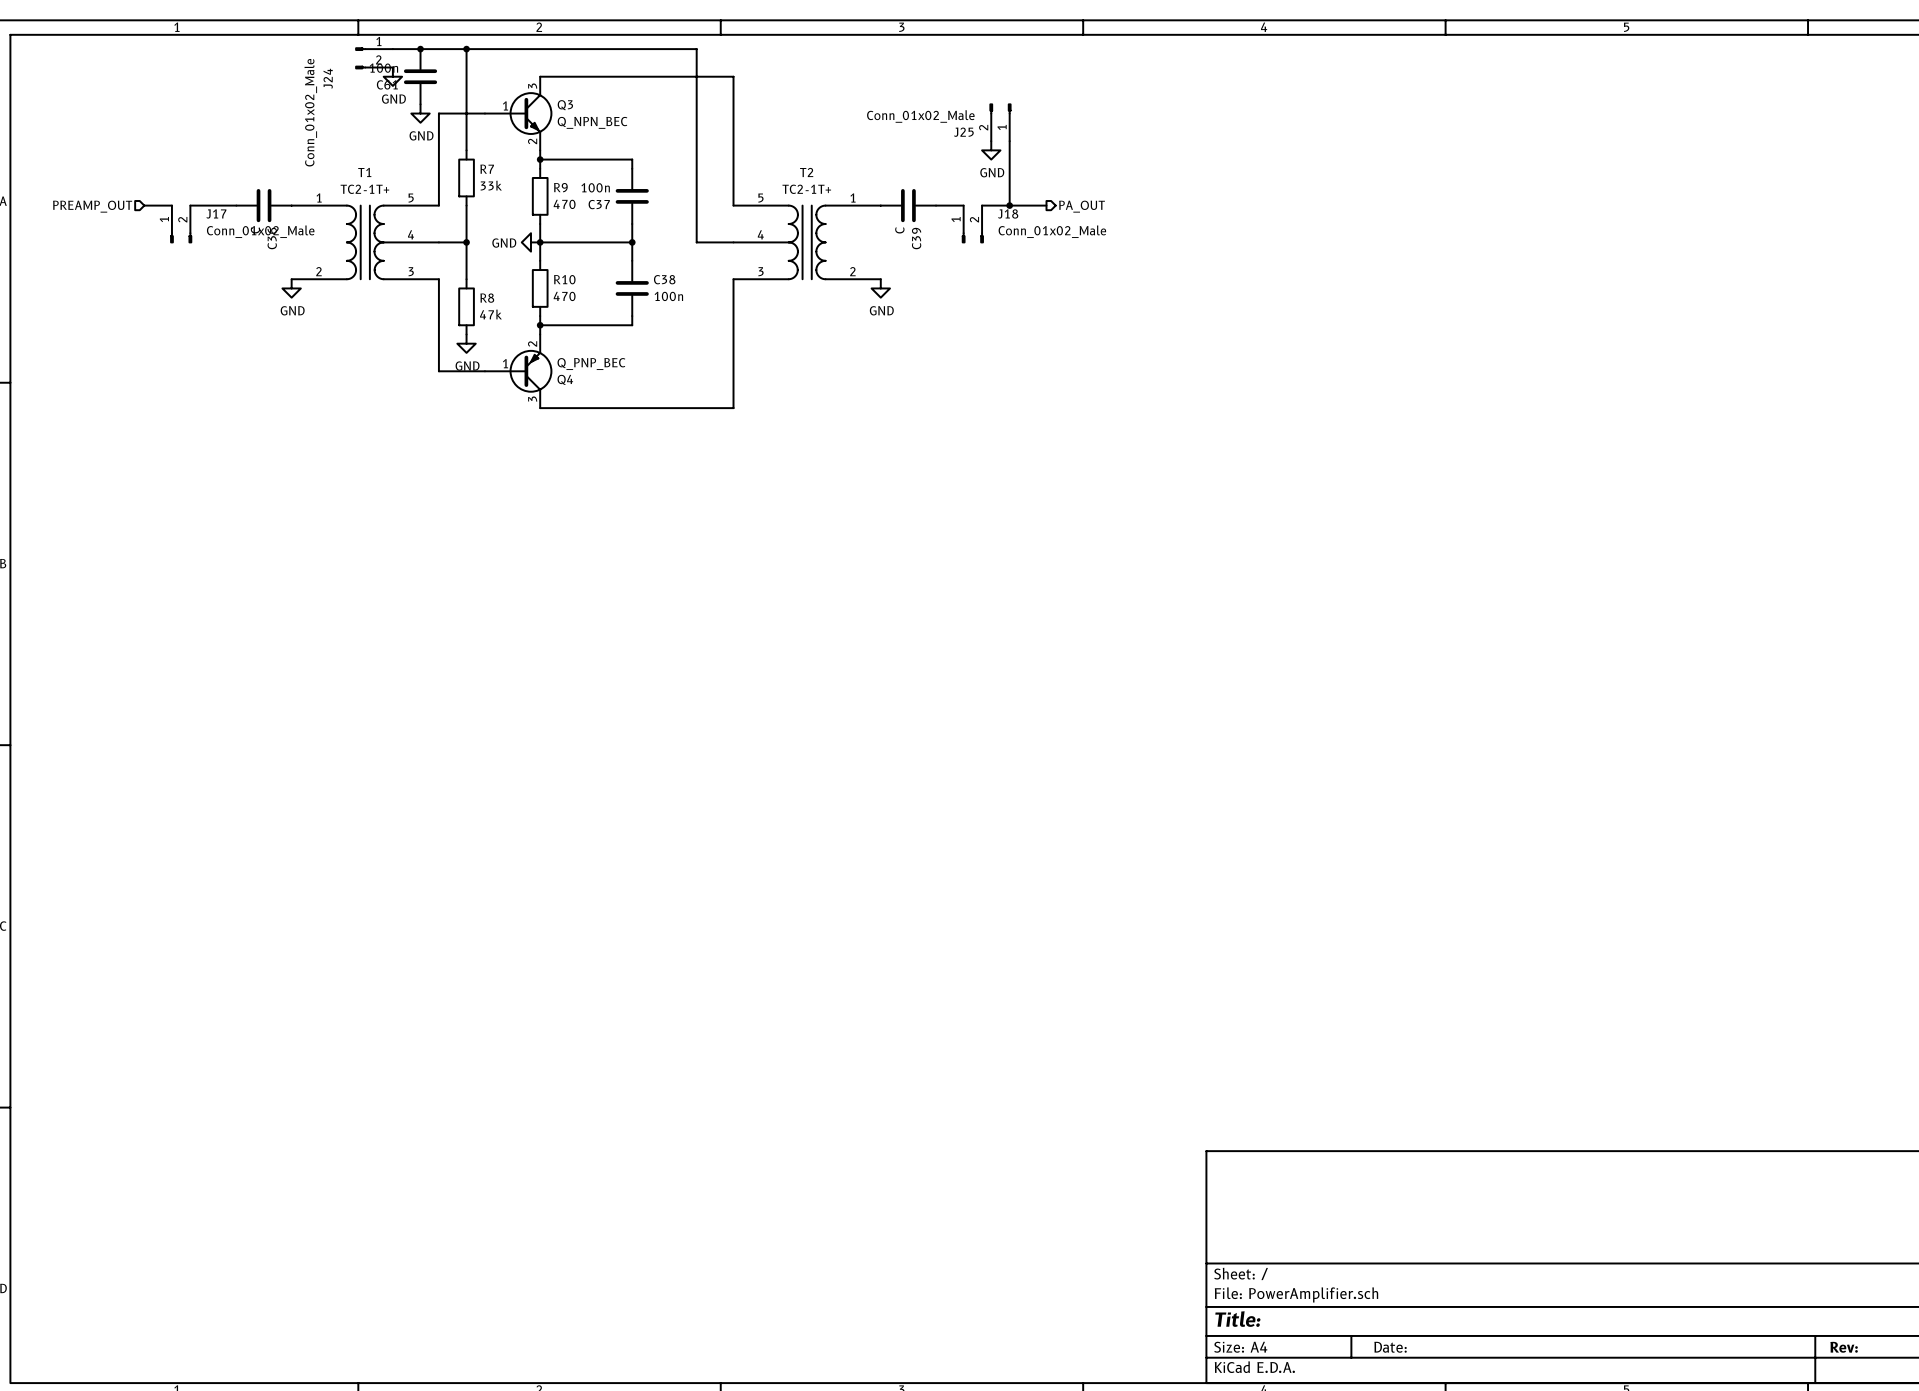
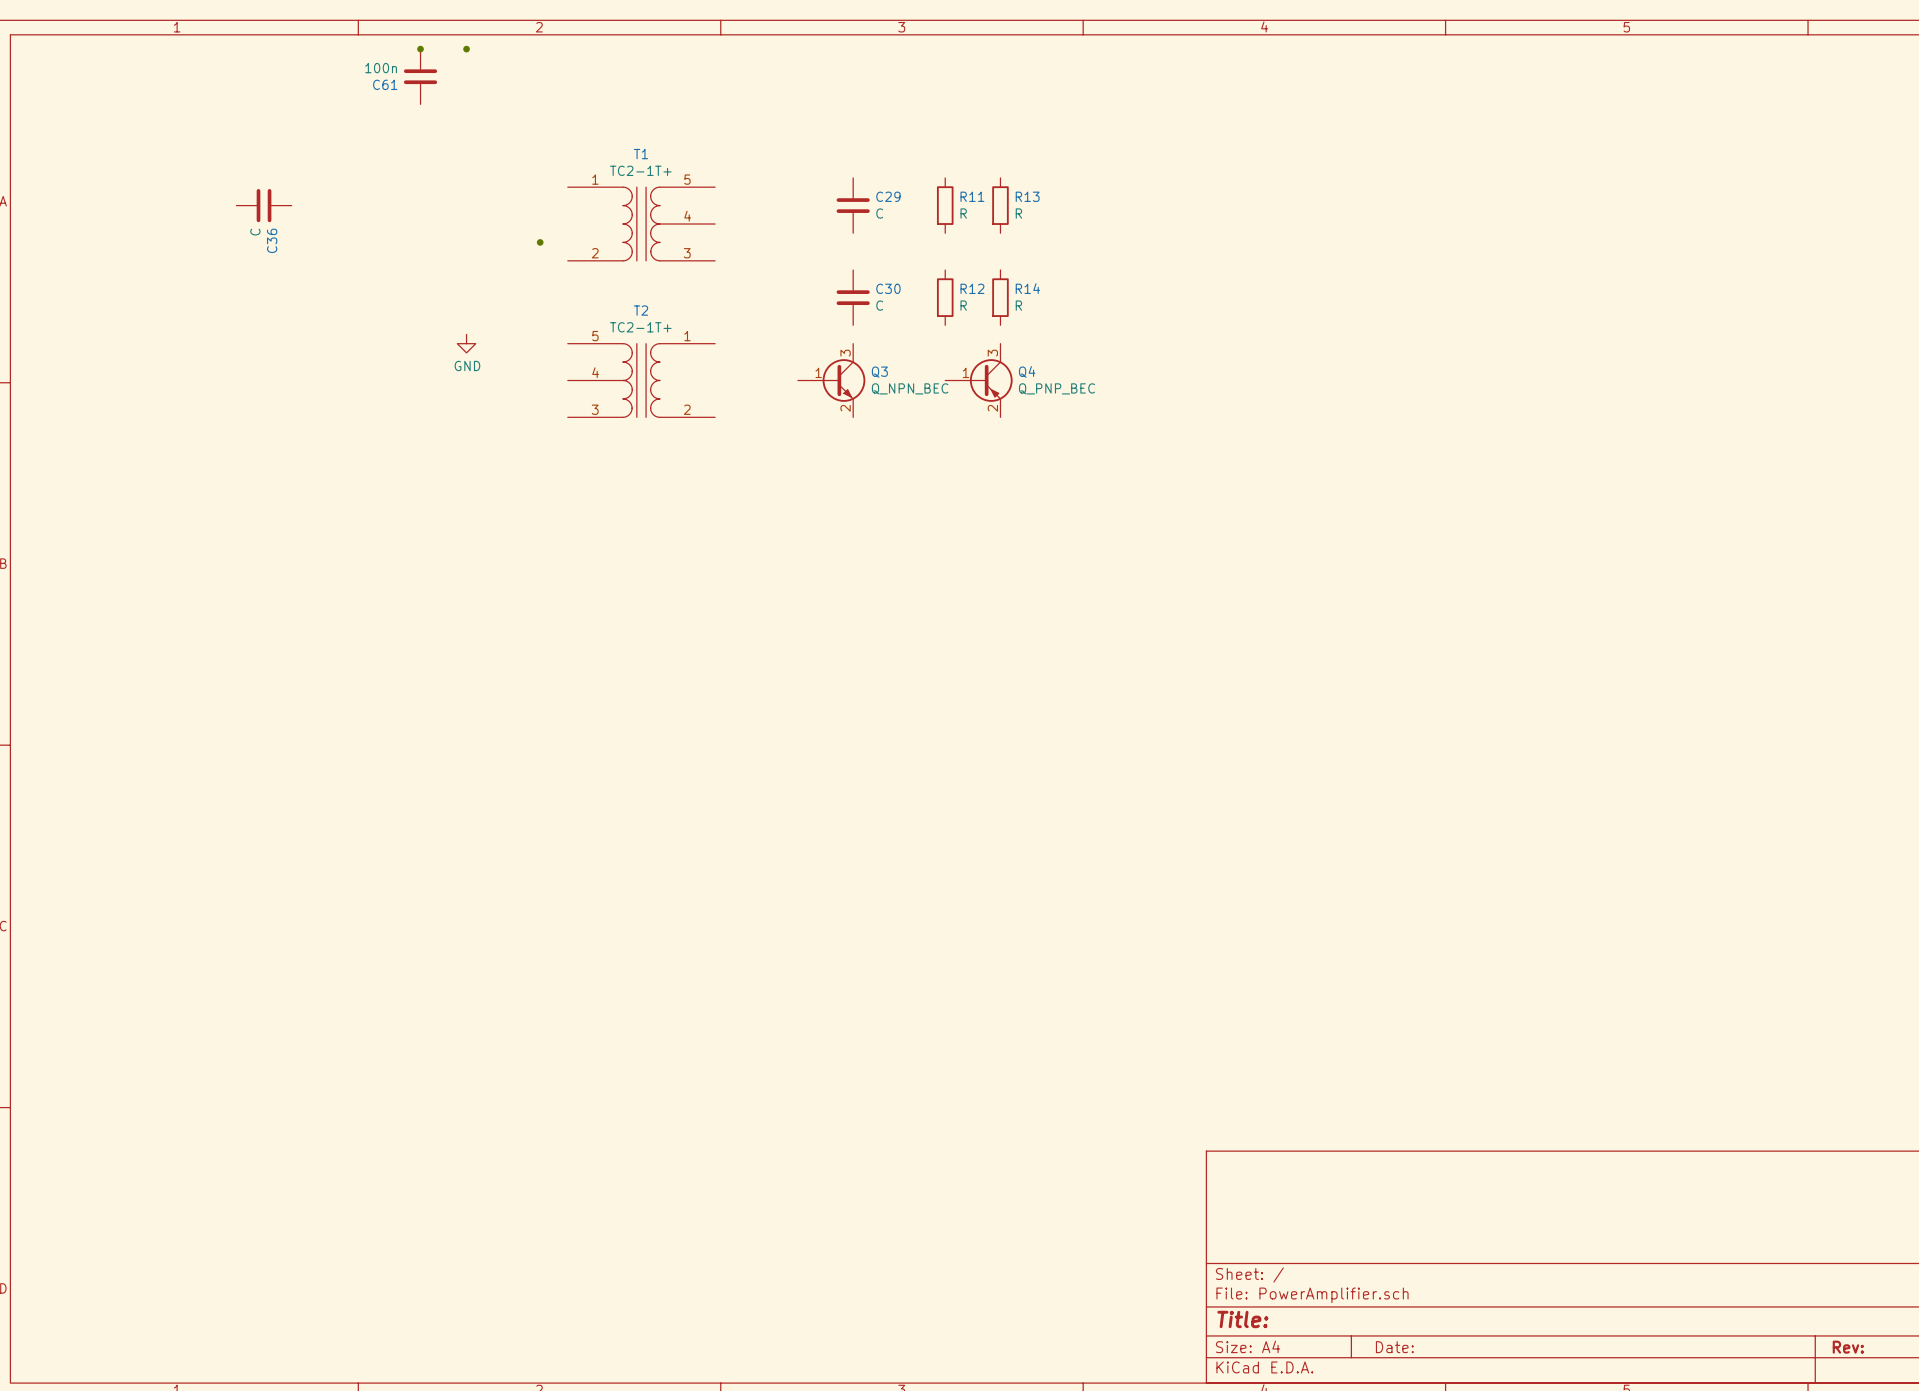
wire: (392, 49) (696, 49) (696, 242) (733, 242) -> none
wire: (466, 49) (466, 150) -> none
J24: Conn_01x02_Male (374, 58) -> none
power symbol: GND (392, 76) -> none
wire: (540, 76) (733, 76) (733, 205) -> none
power symbol: GND (420, 113) -> none
wire: (484, 113) (438, 113) (438, 205) -> none
Q3 position: (518, 113) -> (831, 380)
J25: Conn_01x02_Male (1000, 122) -> none
wire: (1009, 141) (1009, 205) -> none
wire: (540, 150) (540, 168) -> none
power symbol: GND (991, 150) -> none
wire: (540, 159) (632, 159) (632, 168) -> none
junction: (540, 159) -> none
R7: 33k (466, 177) -> none
R9: 470 (540, 196) -> none
C37: 100n (632, 196) -> none
wire: (144, 205) (171, 205) -> none
wire: (190, 205) (236, 205) -> none
wire: (466, 205) (466, 279) -> none
C29: none -> C (853, 205)
C39: C (908, 205) -> none
wire: (936, 205) (963, 205) -> none
R11: none -> R (945, 205)
wire: (982, 205) (1046, 205) -> none
R13: none -> R (1000, 205)
junction: (1009, 205) -> none
hierarchical label: PREAMP_OUT (92, 206) -> none
hierarchical label: PA_OUT (1082, 206) -> none
J17: Conn_01x02_Male (181, 224) -> none
wire: (540, 224) (540, 260) -> none
wire: (632, 224) (632, 260) -> none
J18: Conn_01x02_Male (972, 224) -> none
T1 position: (365, 242) -> (641, 224)
wire: (438, 242) (466, 242) -> none
junction: (466, 242) -> none
power symbol: GND (530, 242) -> none
wire: (540, 242) (632, 242) -> none
junction: (632, 242) -> none
T2 position: (807, 242) -> (641, 380)
wire: (438, 279) (438, 371) (484, 371) -> none
wire: (733, 279) (733, 408) (540, 408) -> none
power symbol: GND (291, 288) -> none
R10: 470 (540, 288) -> none
C38: 100n (632, 288) -> none
power symbol: GND (880, 288) -> none
C30: none -> C (853, 297)
R12: none -> R (945, 297)
R14: none -> R (1000, 297)
R8: 47k (466, 306) -> none
wire: (540, 316) (540, 334) -> none
wire: (632, 316) (632, 325) (540, 325) -> none
junction: (540, 325) -> none
Q4 position: (518, 371) -> (978, 380)
Q4 flip: as is (530, 371) -> up-down (991, 380)

